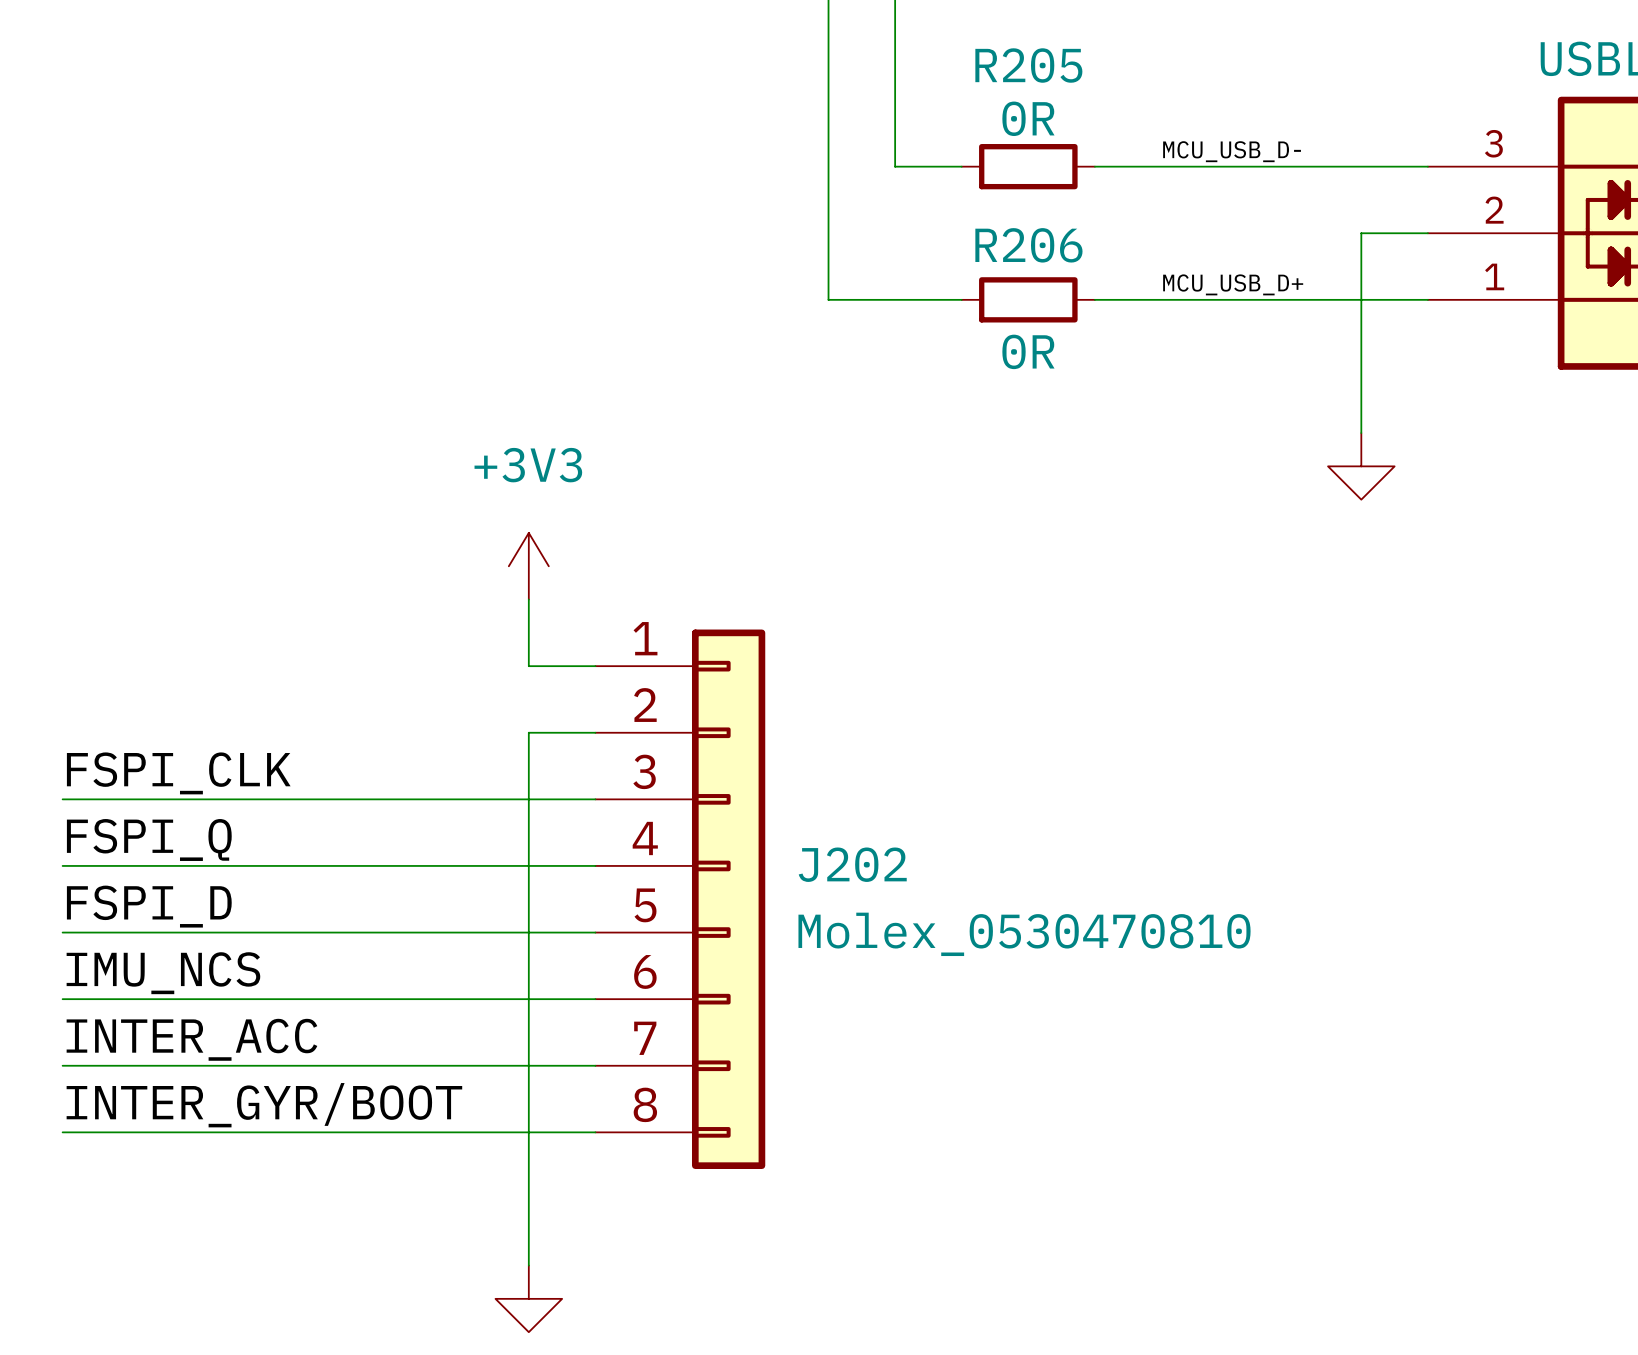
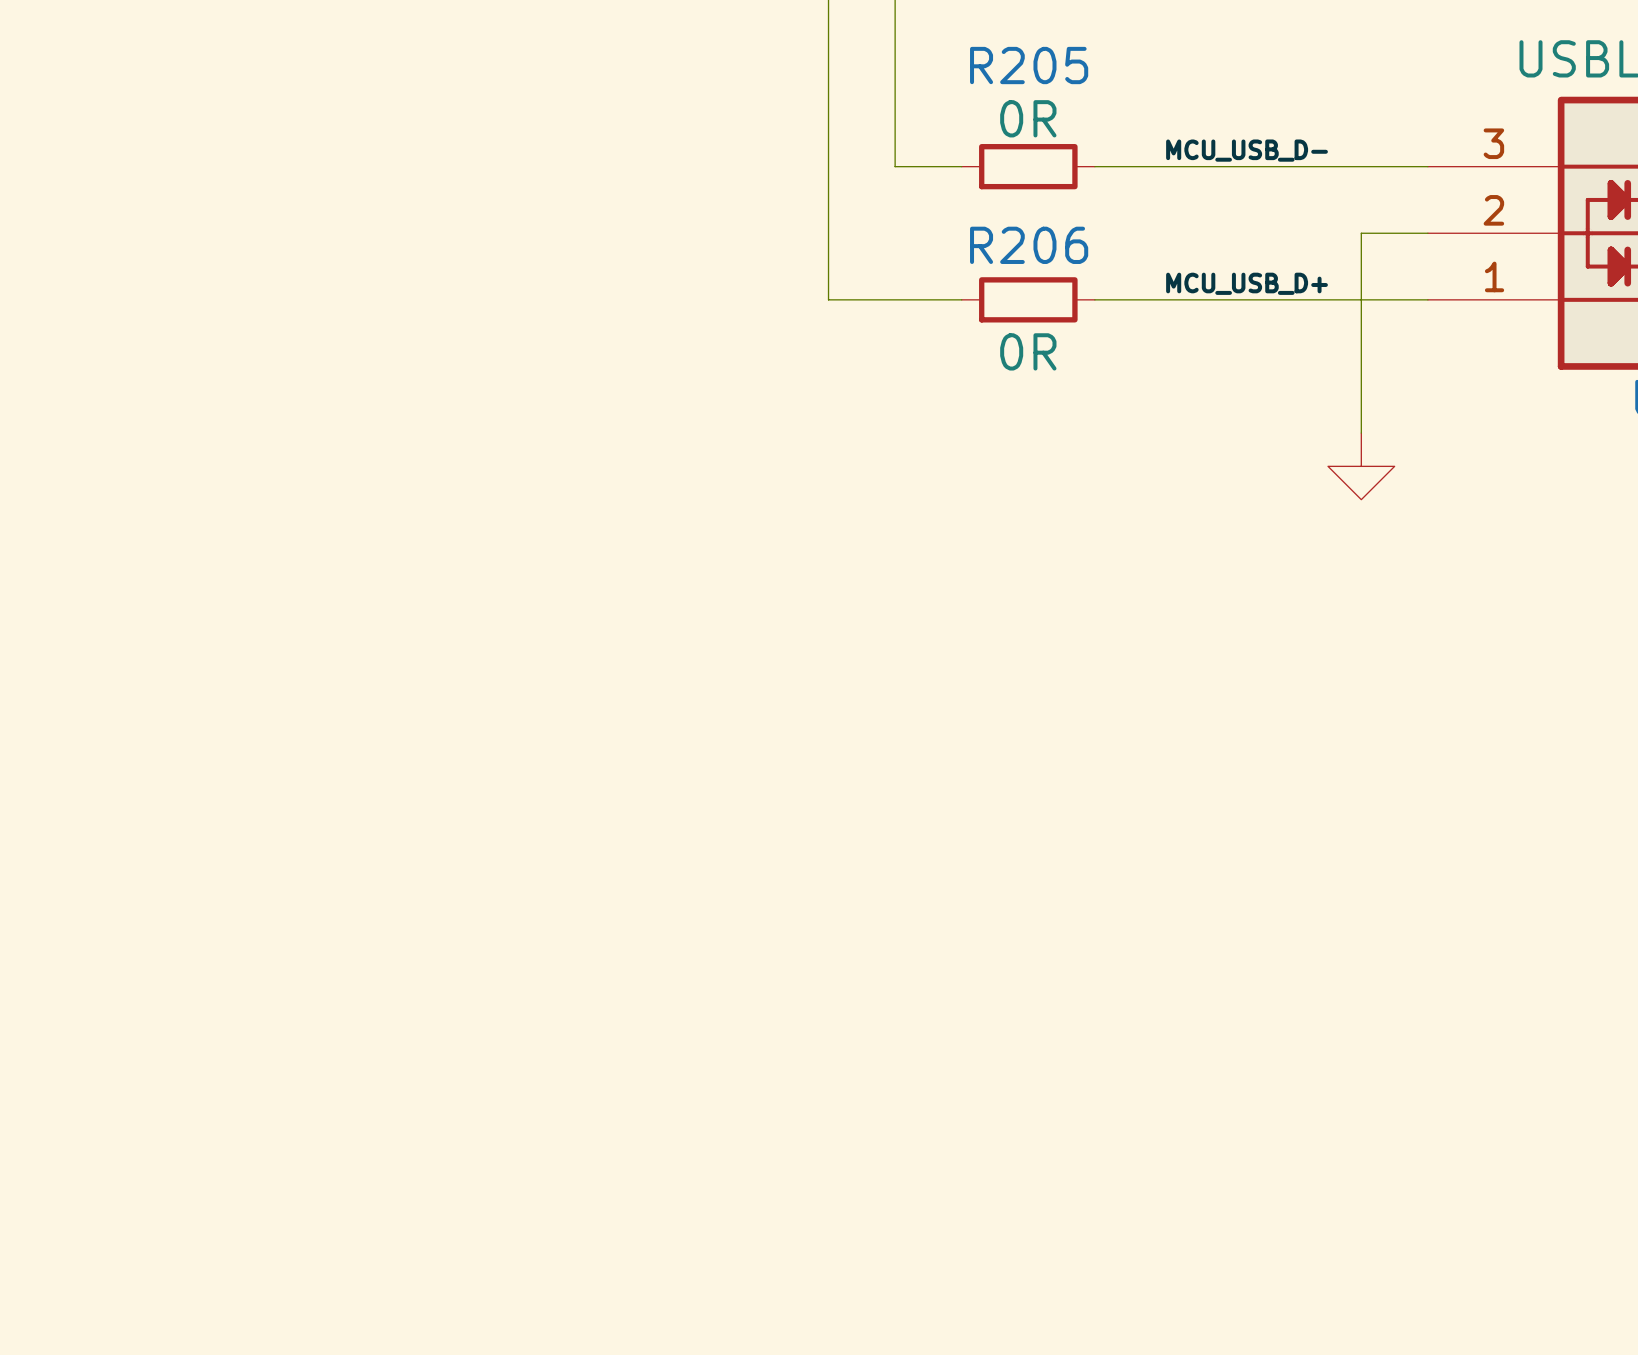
power symbol: +3V3 (528, 566) -> none
wire: (528, 599) (528, 666) (595, 666) -> none
wire: (595, 732) (528, 732) (528, 1265) -> none
label: FSPI_CLK (178, 773) -> none
wire: (62, 799) (595, 799) -> none
label: FSPI_Q (149, 839) -> none
wire: (62, 865) (595, 865) -> none
J202: Molex_0530470810 (680, 899) -> none
label: FSPI_D (149, 906) -> none
wire: (62, 932) (595, 932) -> none
label: IMU_NCS (163, 973) -> none
wire: (62, 999) (595, 999) -> none
label: INTER_ACC (191, 1039) -> none
wire: (62, 1065) (595, 1065) -> none
label: INTER_GYR/BOOT (264, 1105) -> none
wire: (62, 1132) (595, 1132) -> none
power symbol: (528, 1298) -> none

